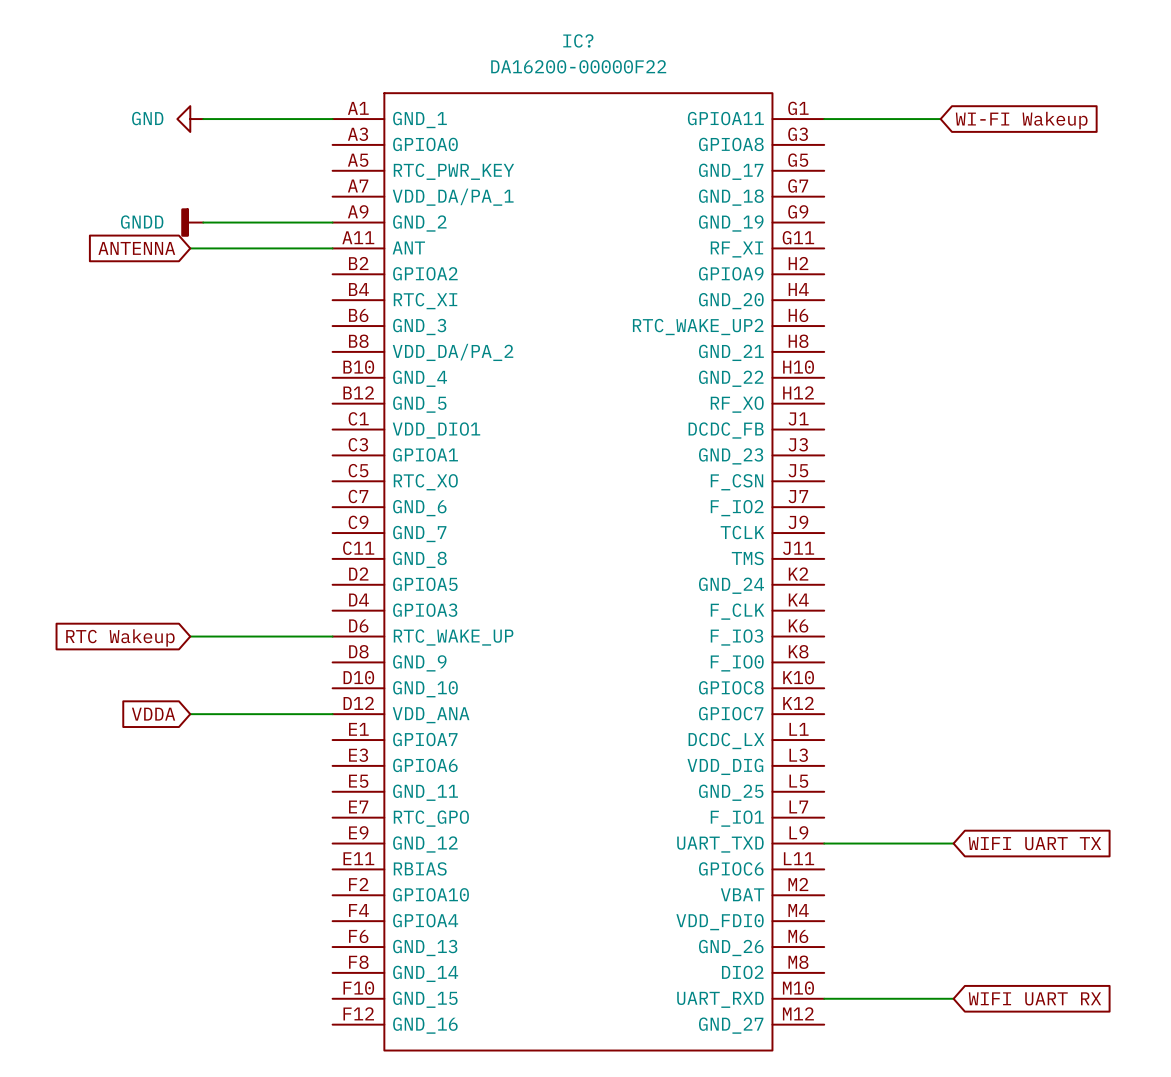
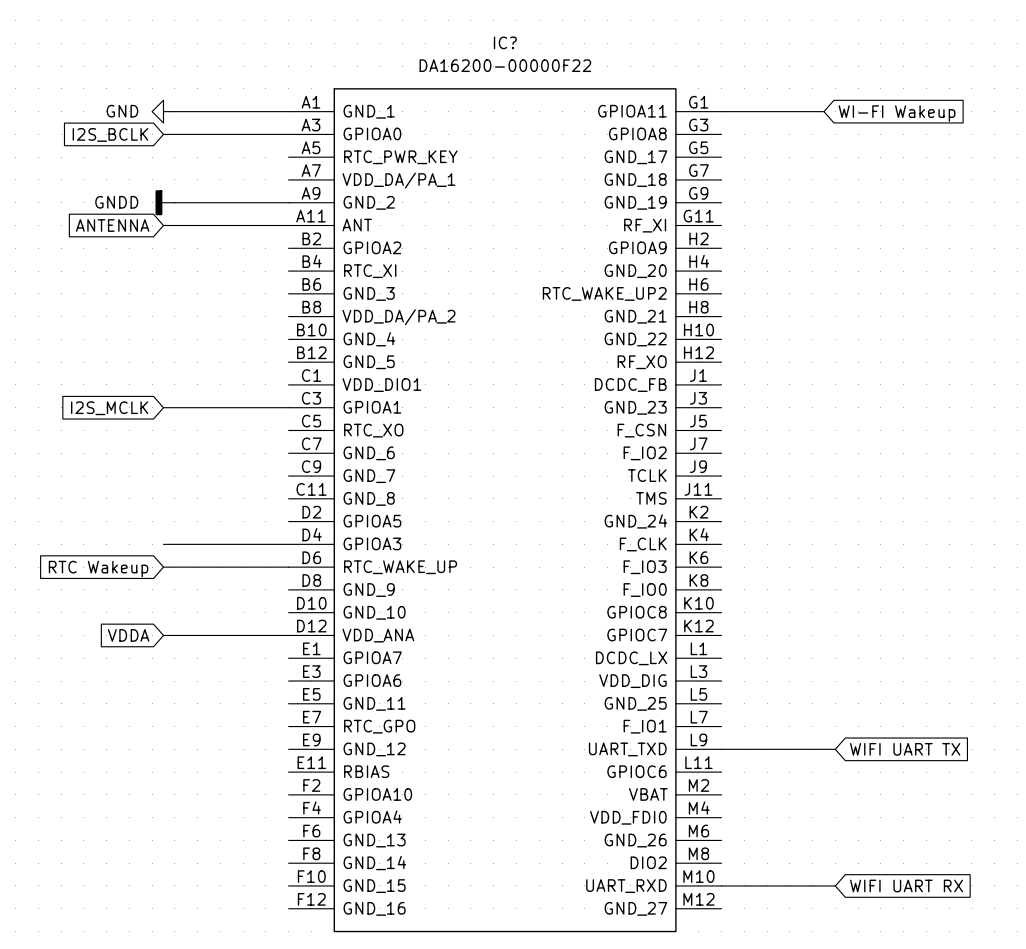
wire: none -> (163, 134) (288, 134)
global label: none -> I2S_BCLK (110, 134)
wire: none -> (163, 407) (288, 407)
global label: none -> I2S_MCLK (109, 408)
wire: none -> (163, 544) (288, 544)

